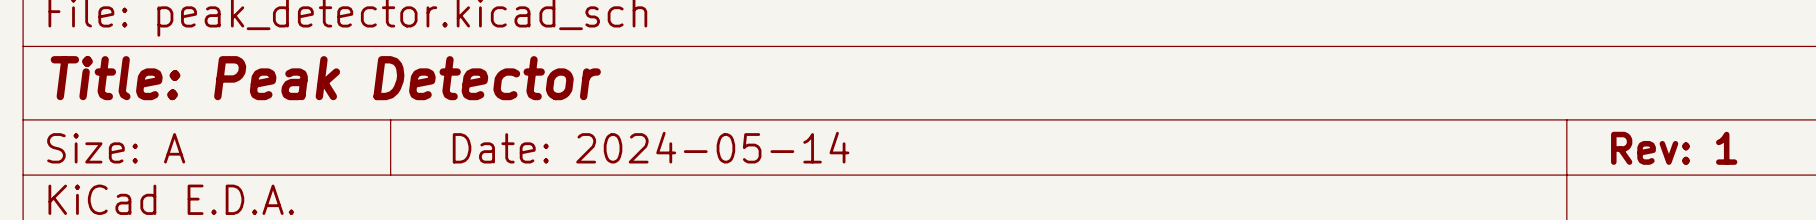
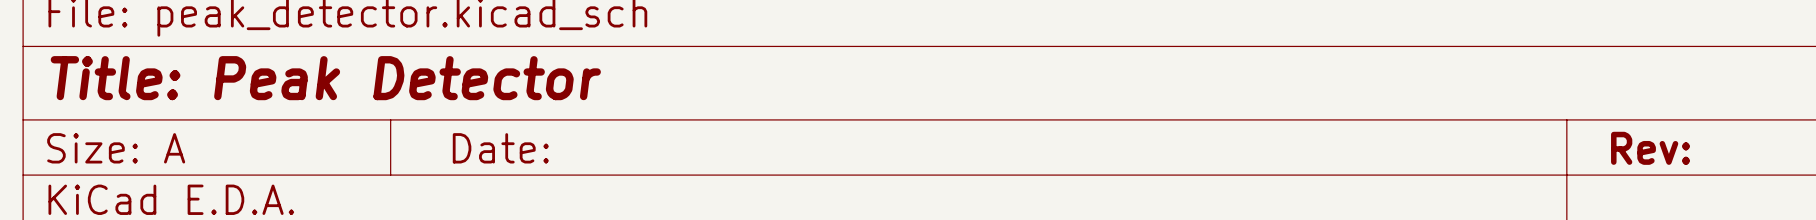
title block: Date: 2024-05-14 (651, 147) -> Date: (500, 148)
title block: Rev: 1 (1674, 148) -> Rev: (1650, 148)

